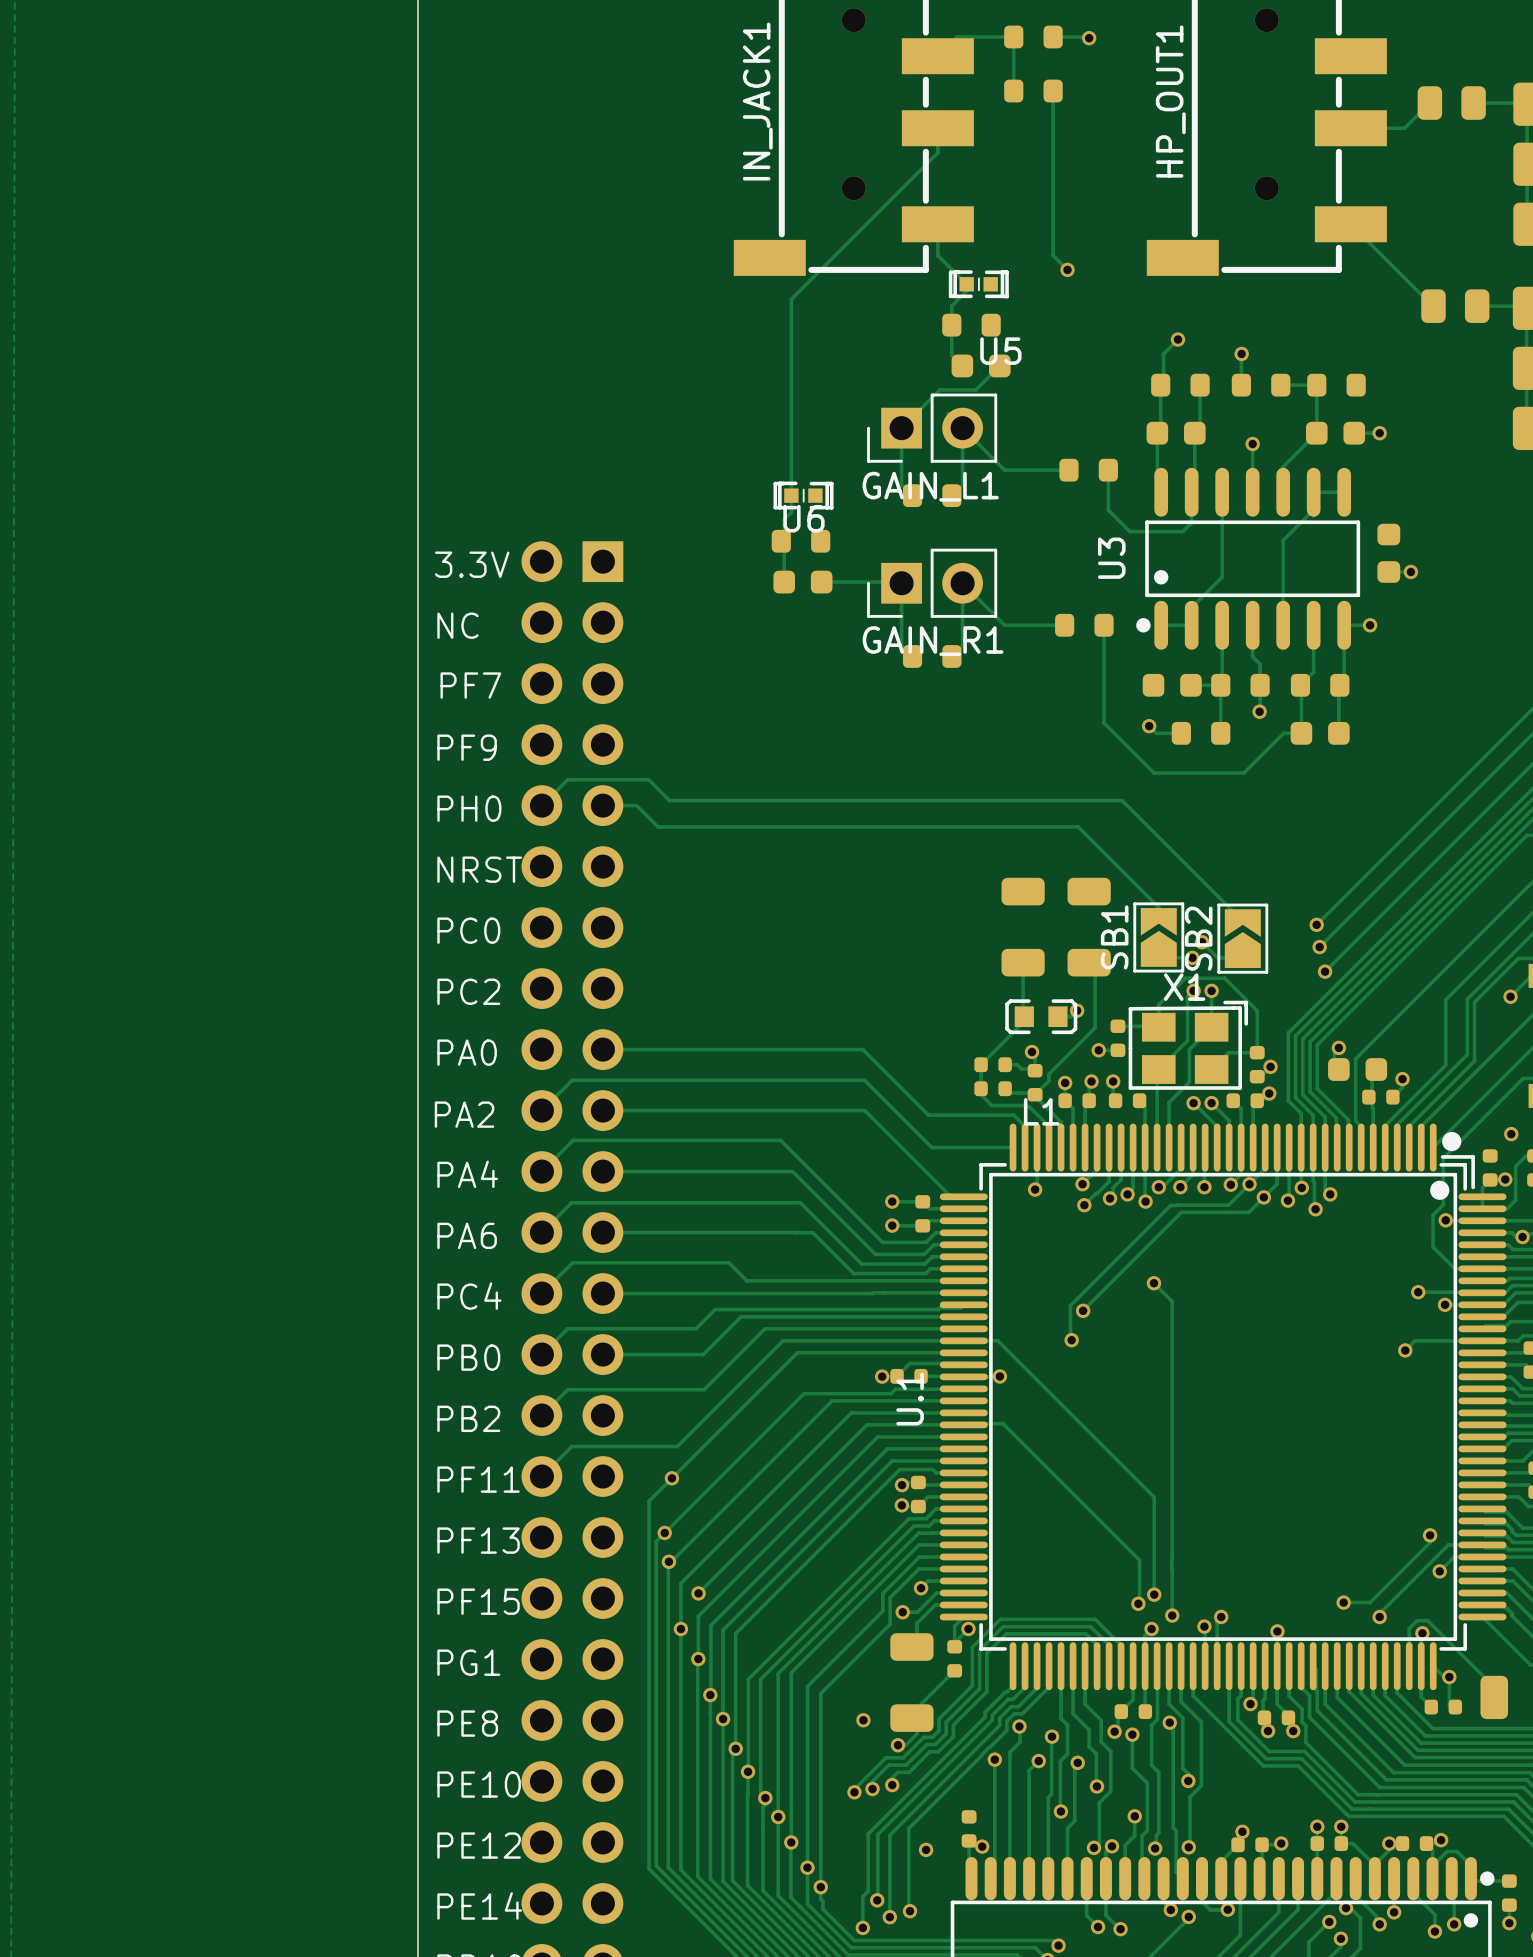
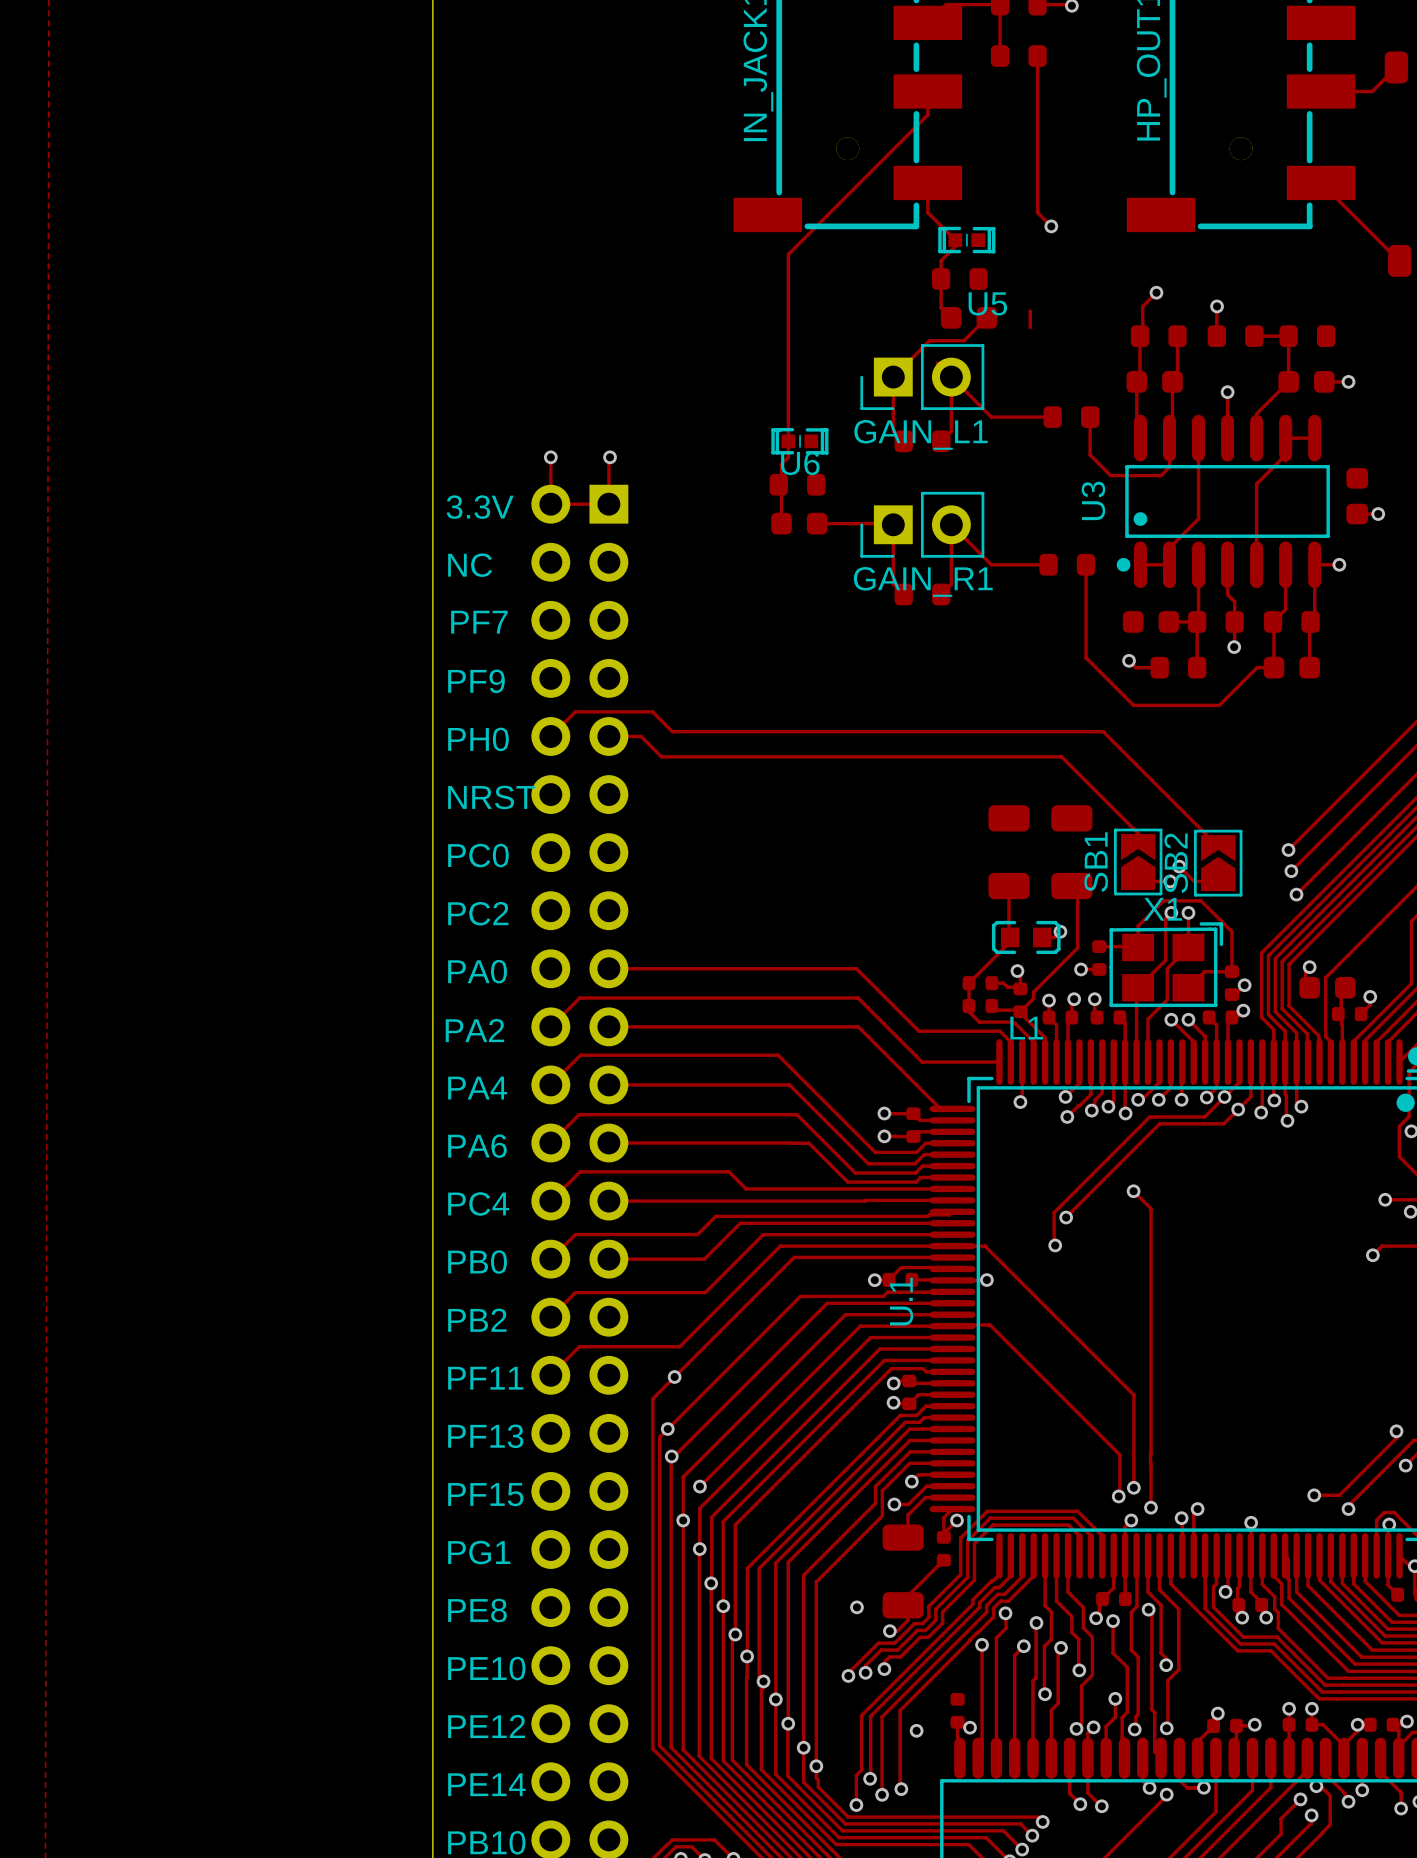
track: none -> (1030, 311) (1030, 327)
track: none -> (550, 457) (550, 504) (608, 504) (610, 457)
via: none -> (550, 457)
via: none -> (610, 457)

